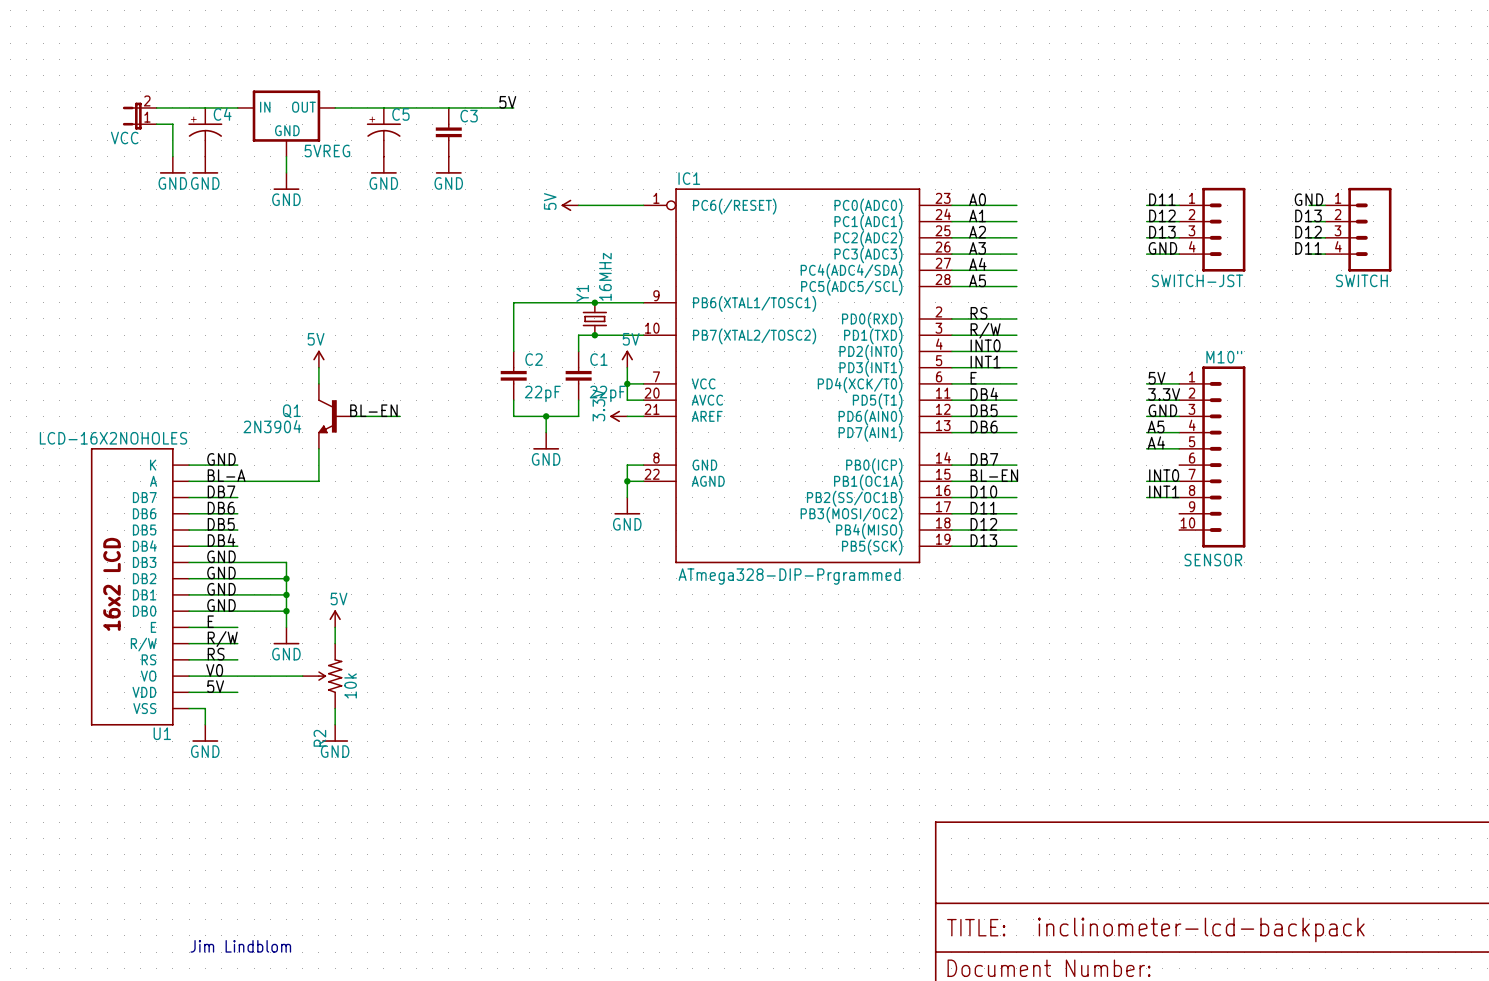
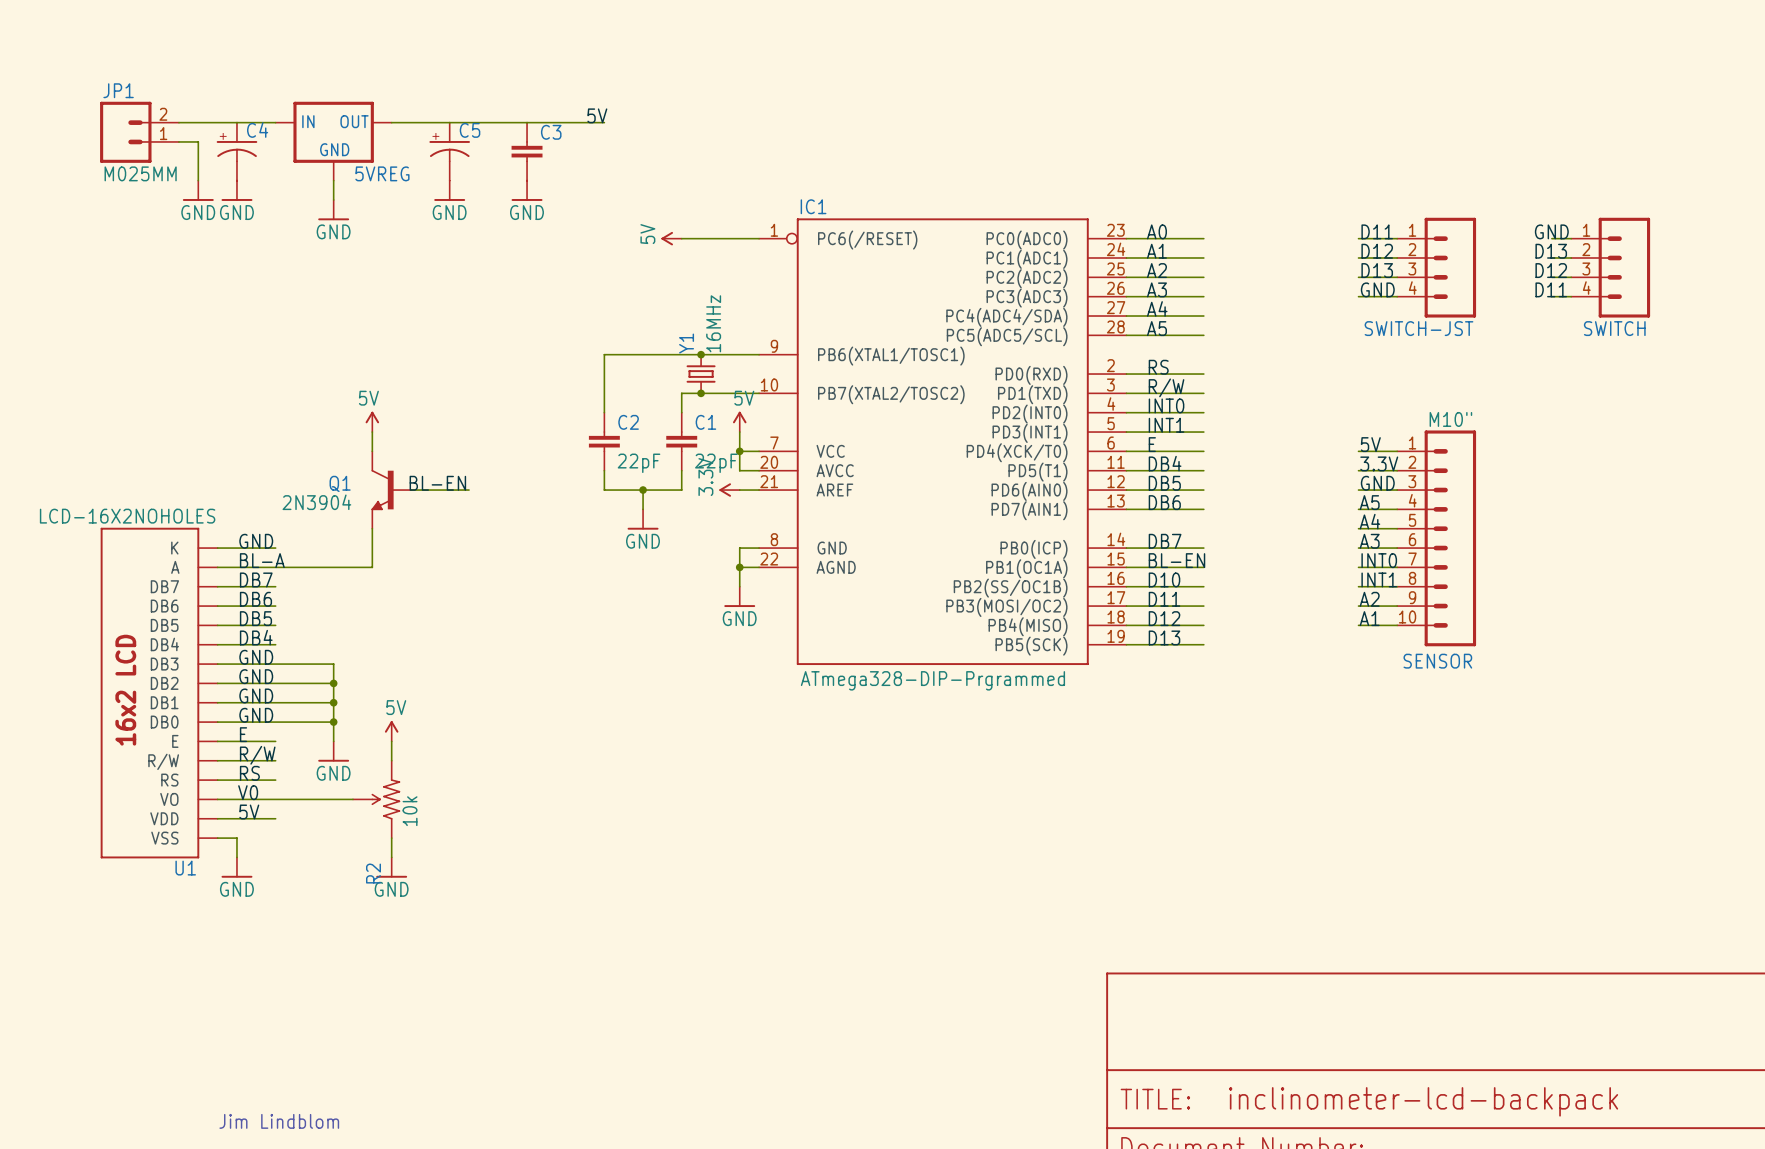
JP1: none -> M025MM (139, 132)
VCC: (139, 116) -> none
label: none -> A3 (1369, 541)
wire: none -> (1358, 548) (1397, 548)
label: none -> A2 (1369, 599)
wire: none -> (1358, 606) (1397, 606)
label: none -> A1 (1369, 618)
wire: none -> (1358, 625) (1397, 625)

